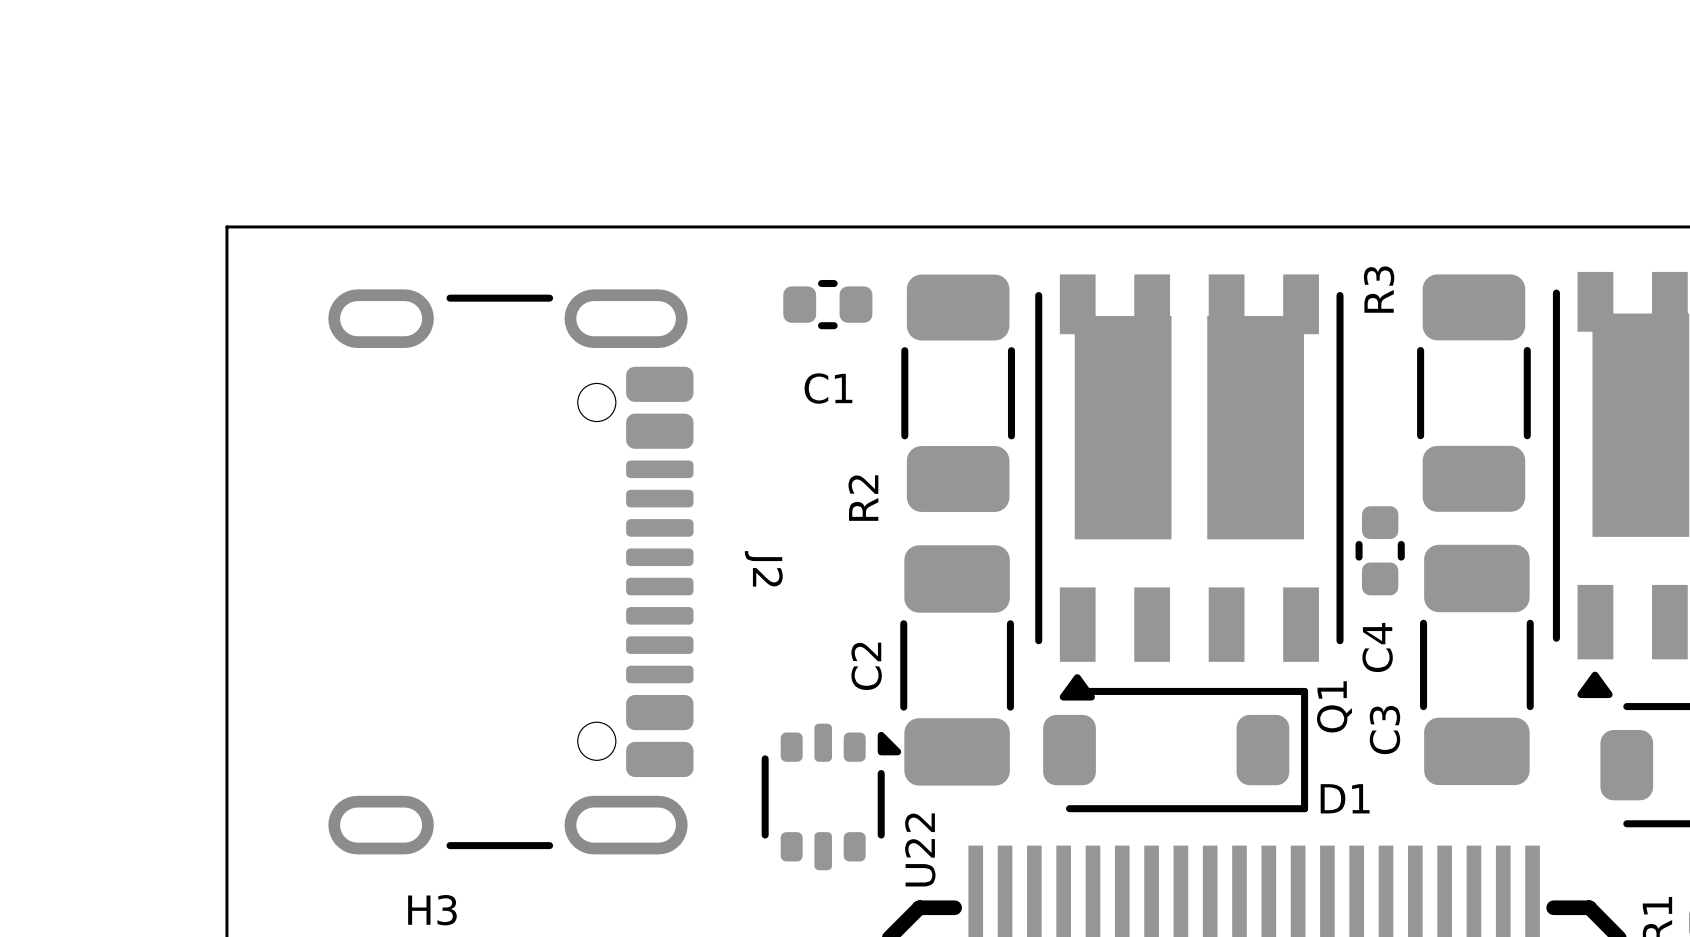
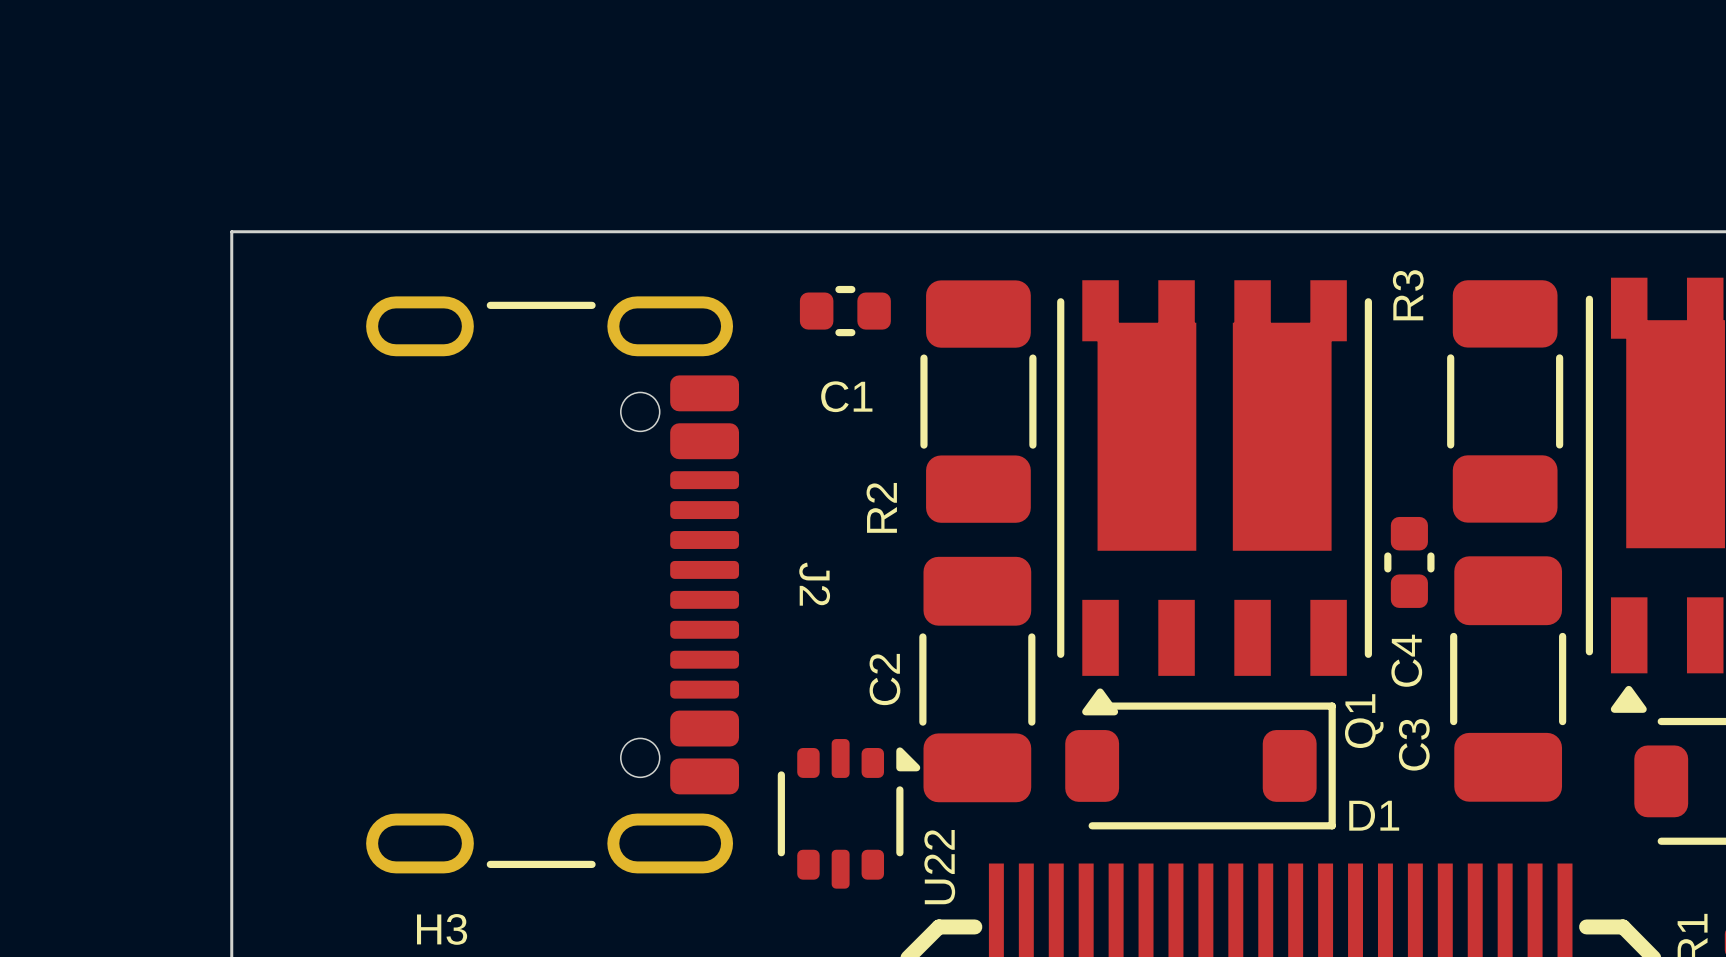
J2 position: (510, 571) -> (552, 584)

